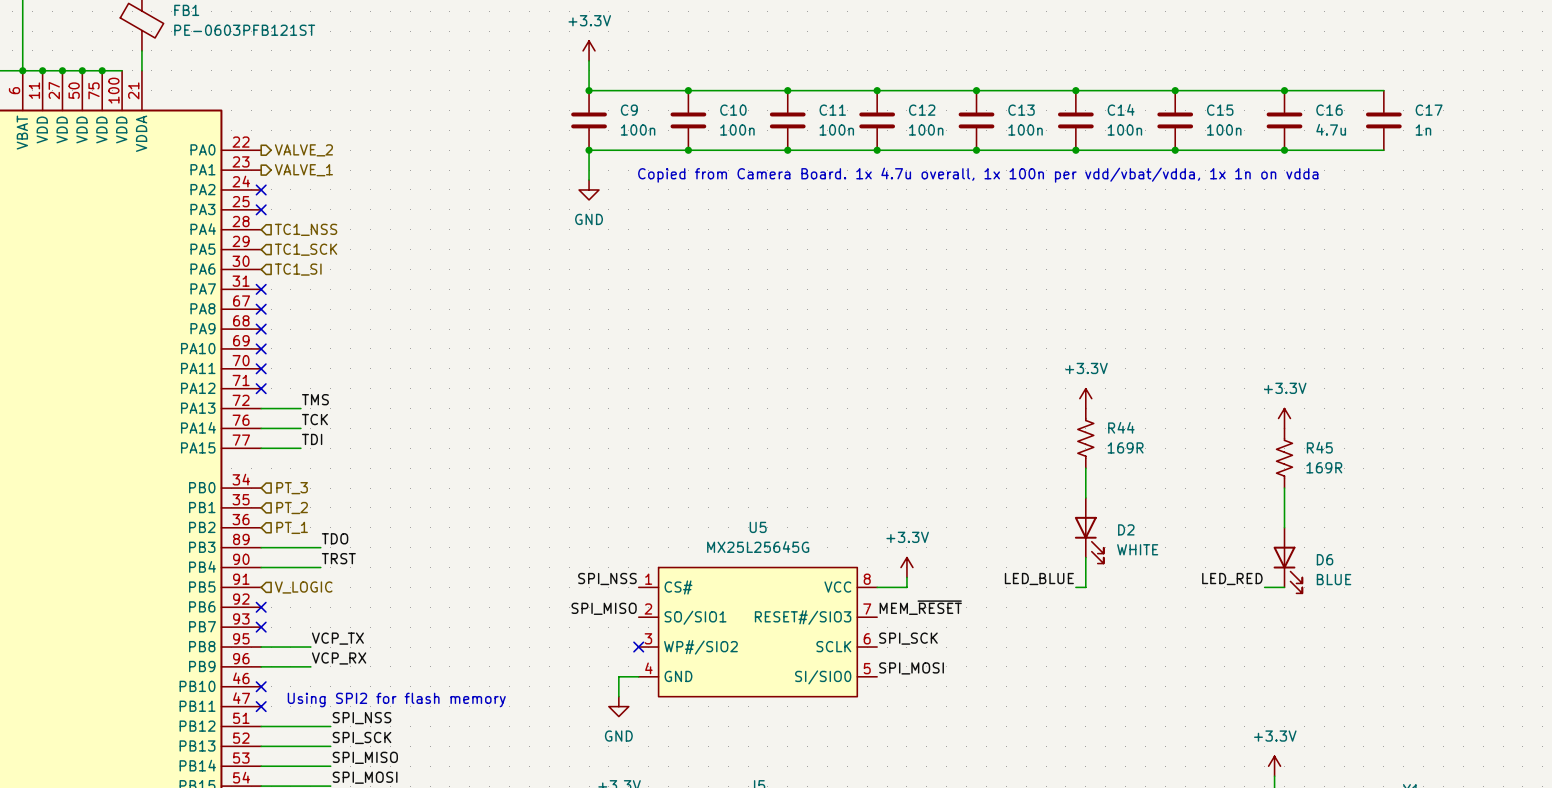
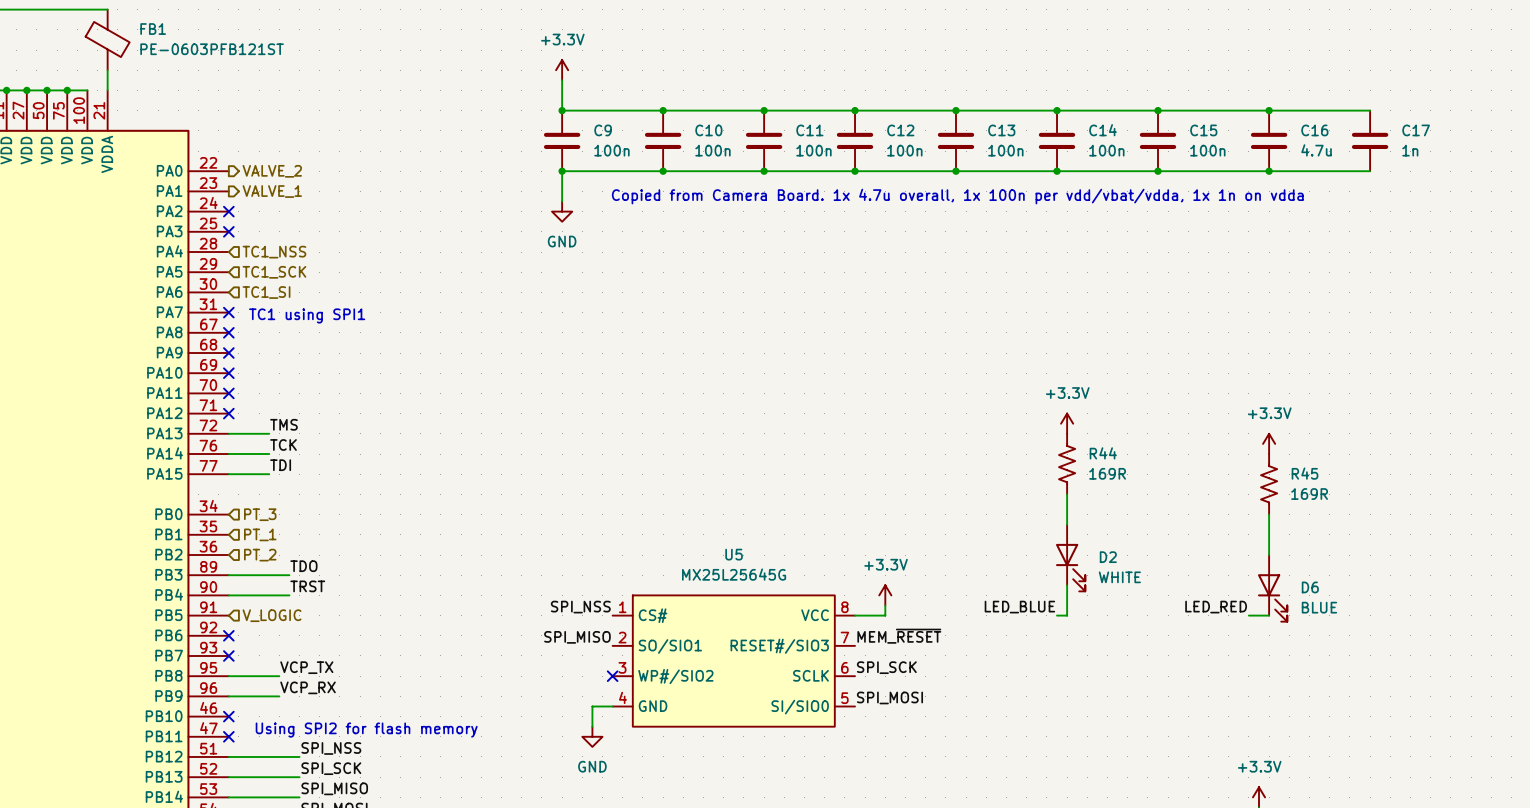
text: none -> TC1 using SPI1 (307, 315)
hierarchical label: PT_2 (292, 508) -> PT_1 (260, 534)
hierarchical label: PT_1 (292, 527) -> PT_2 (260, 555)

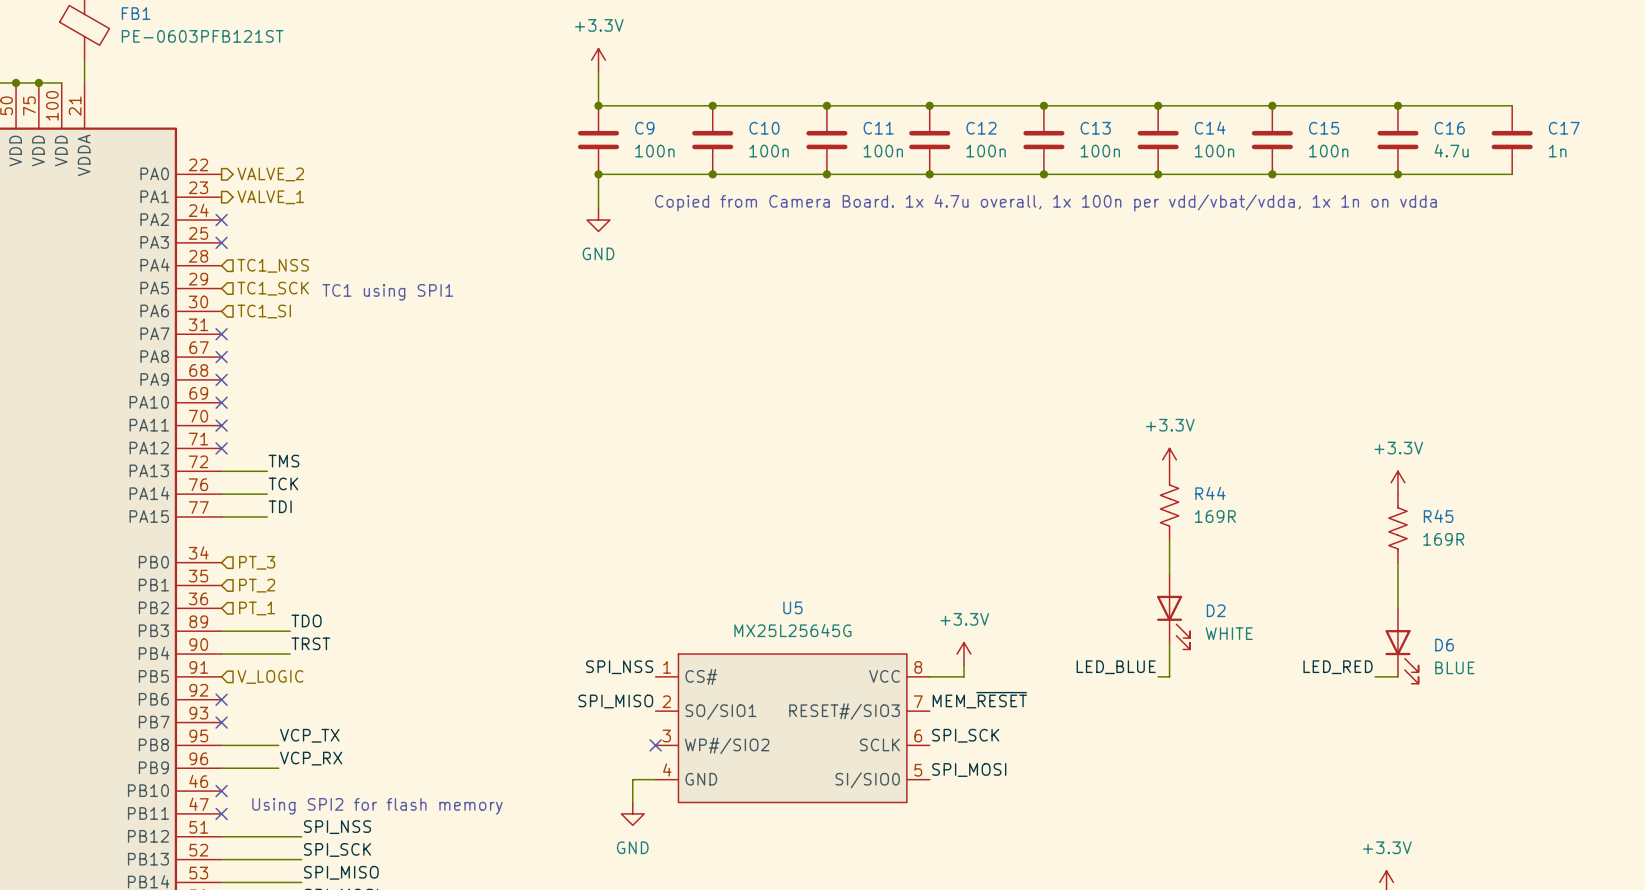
text position: TC1 using SPI1 (307, 315) -> TC1 using SPI1 (387, 292)
hierarchical label: PT_1 (260, 534) -> PT_2 (257, 585)
hierarchical label: PT_2 (260, 555) -> PT_1 (257, 608)

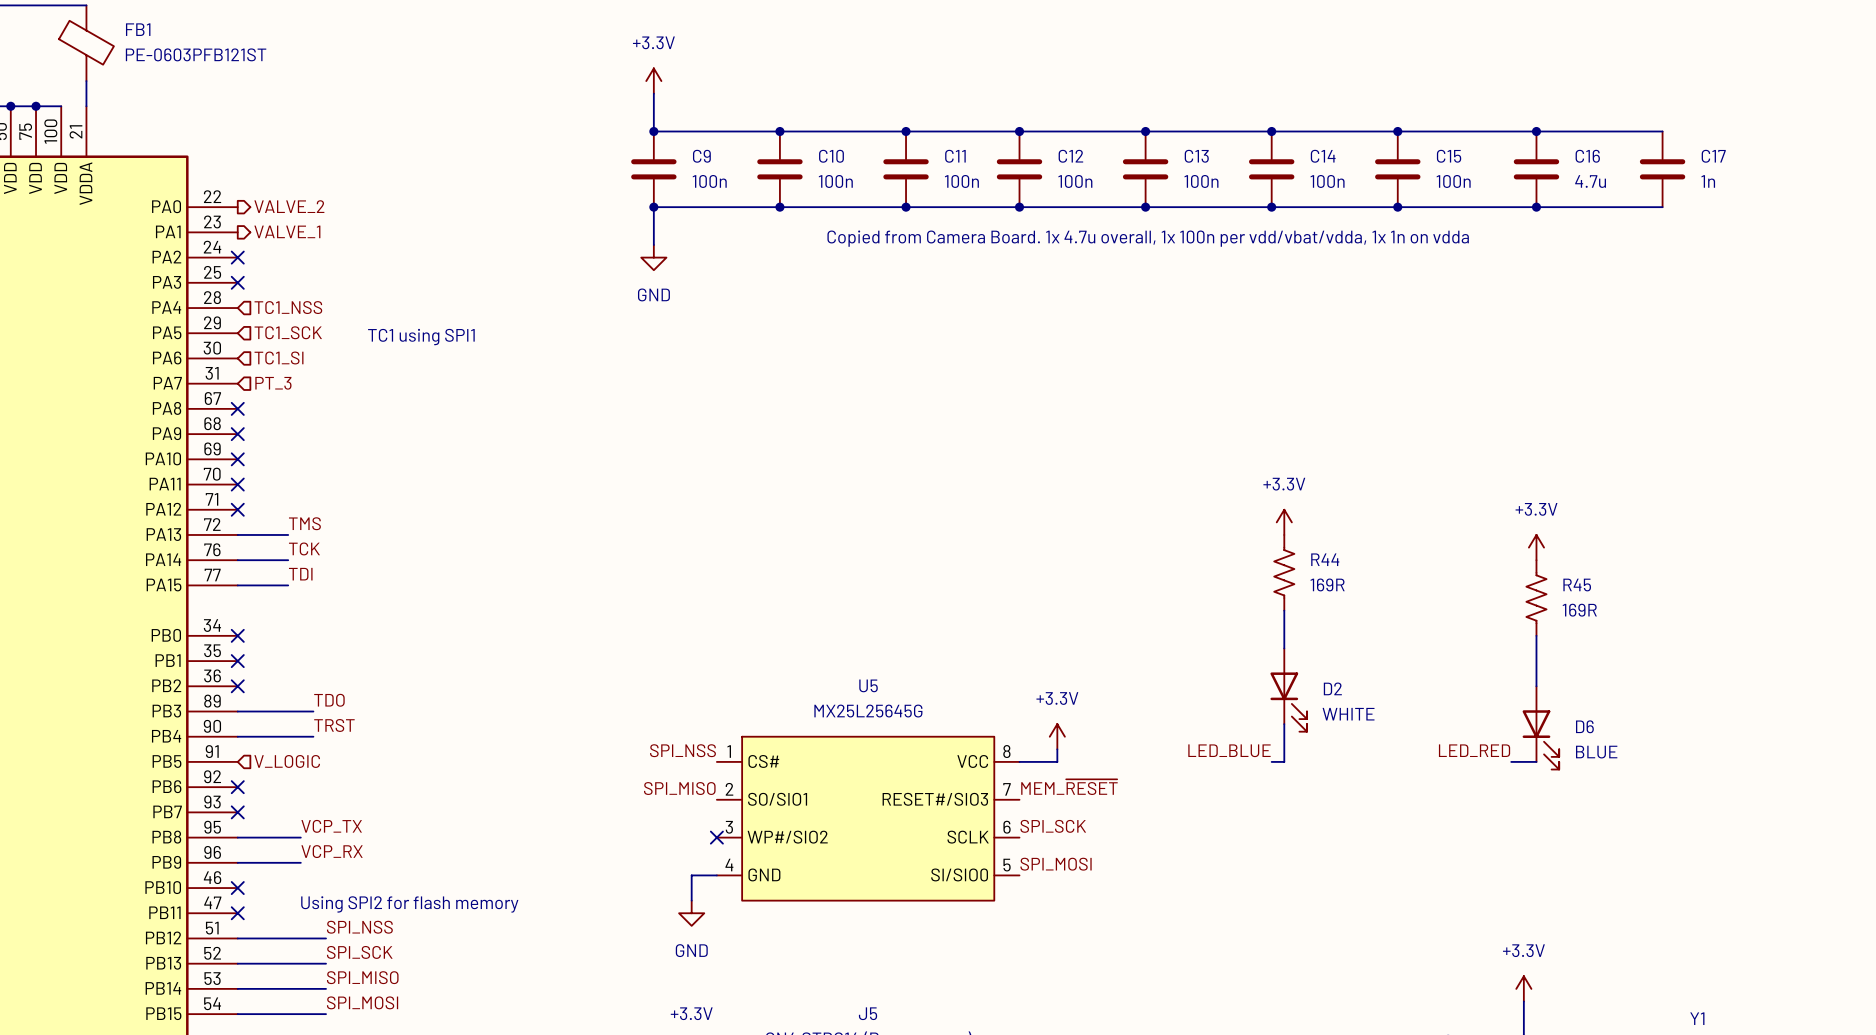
no-connect mark: (221, 334) -> none
hierarchical label: none -> PT_3 (273, 383)
no-connect mark: none -> (237, 635)
hierarchical label: PT_3 (257, 562) -> none
no-connect mark: none -> (237, 661)
hierarchical label: PT_2 (257, 585) -> none
no-connect mark: none -> (237, 686)
hierarchical label: PT_1 (257, 608) -> none

